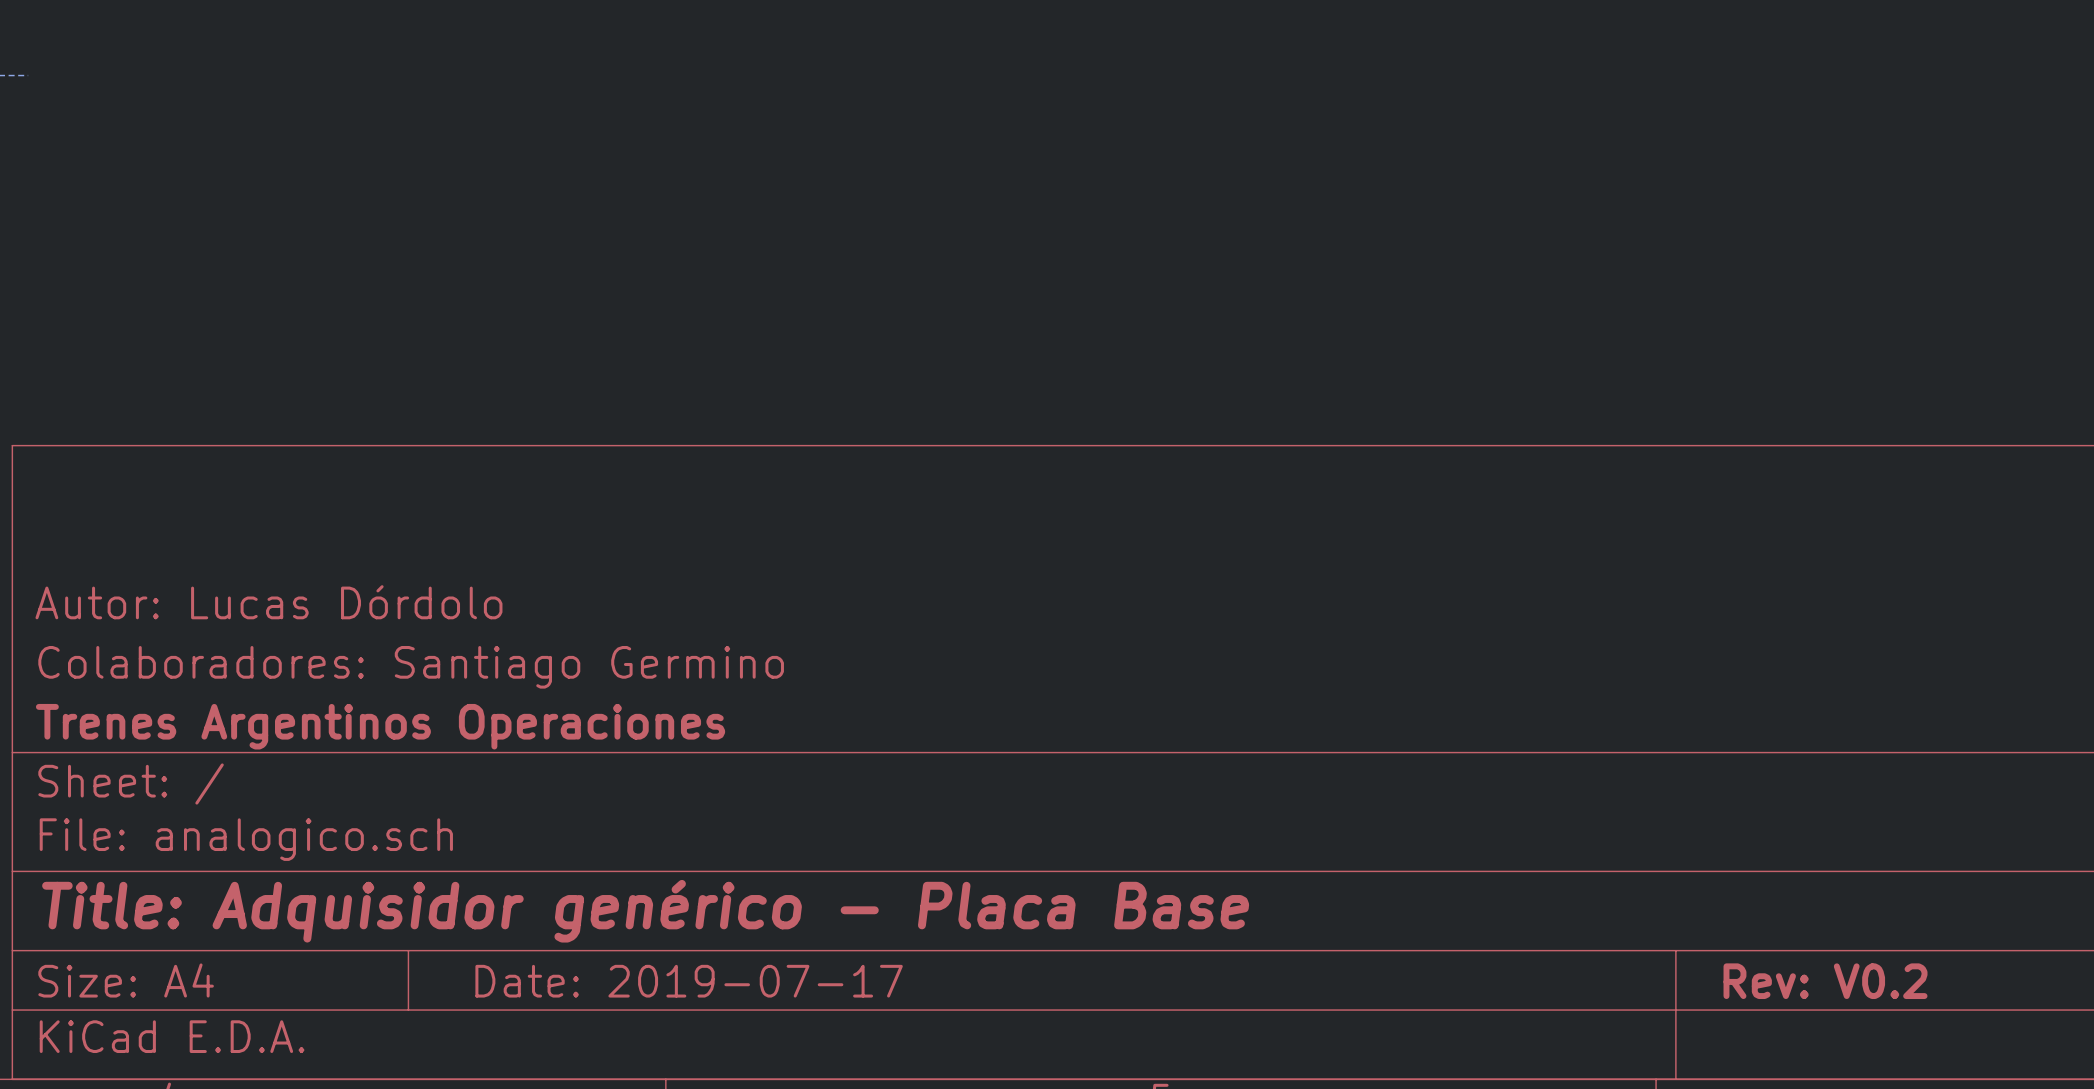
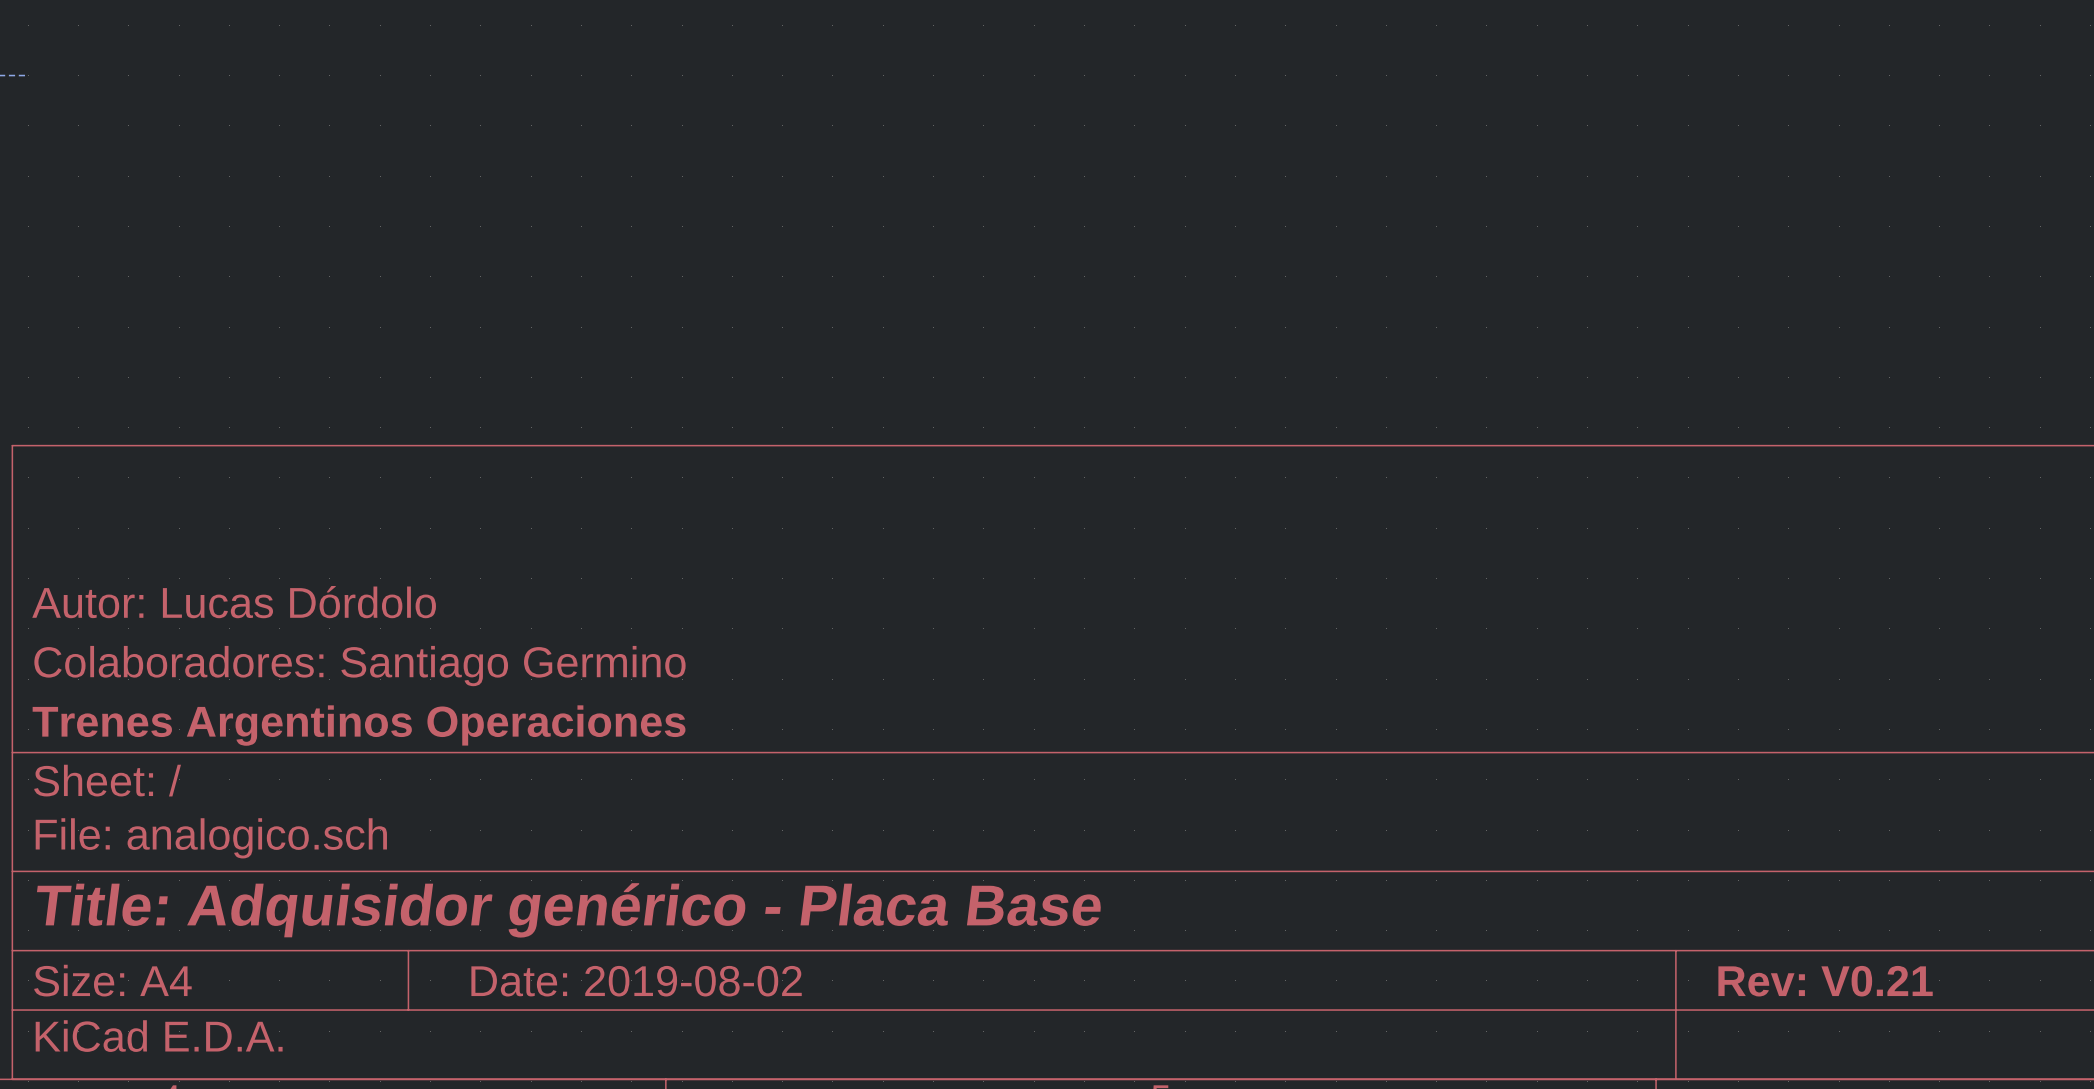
title block: Date: 2019-07-17 (689, 981) -> Date: 2019-08-02 (636, 981)
title block: Rev: V0.2 (1825, 981) -> Rev: V0.21 (1825, 981)

